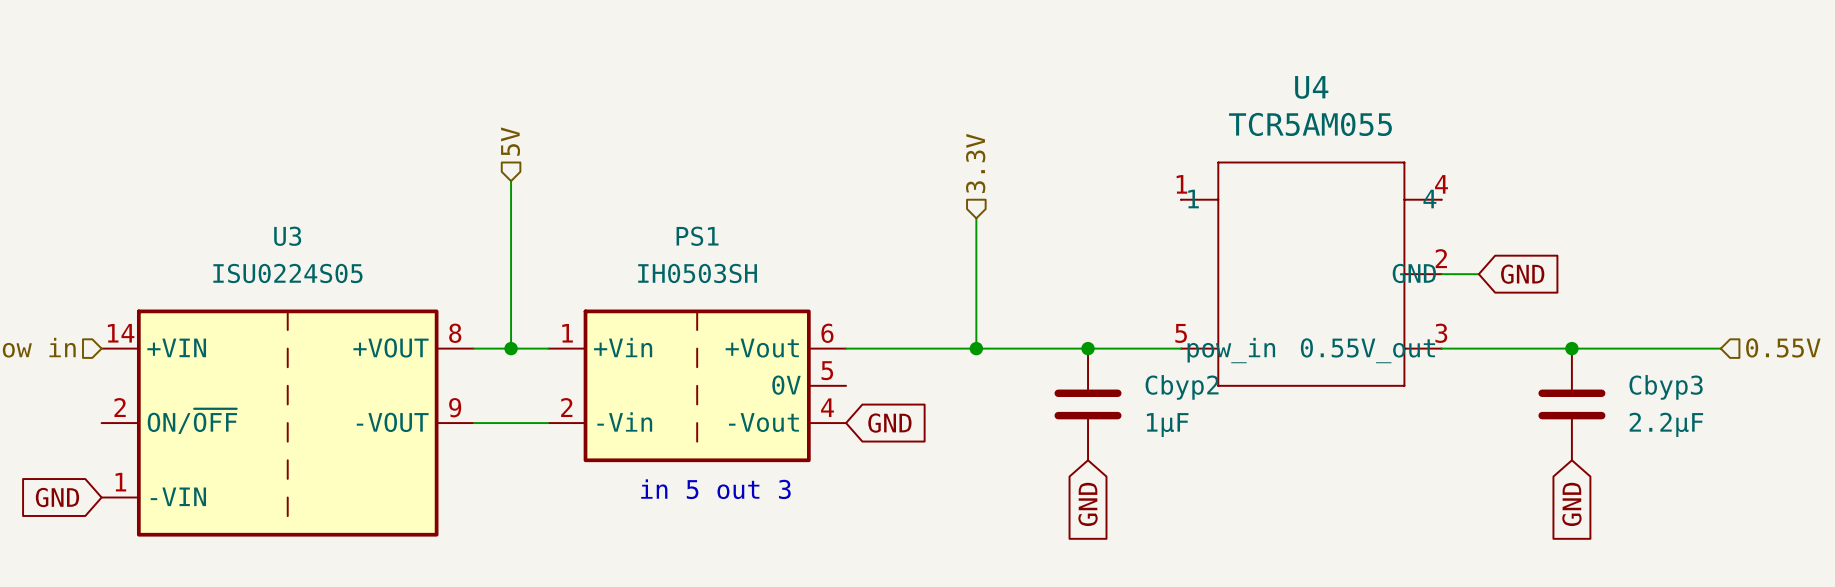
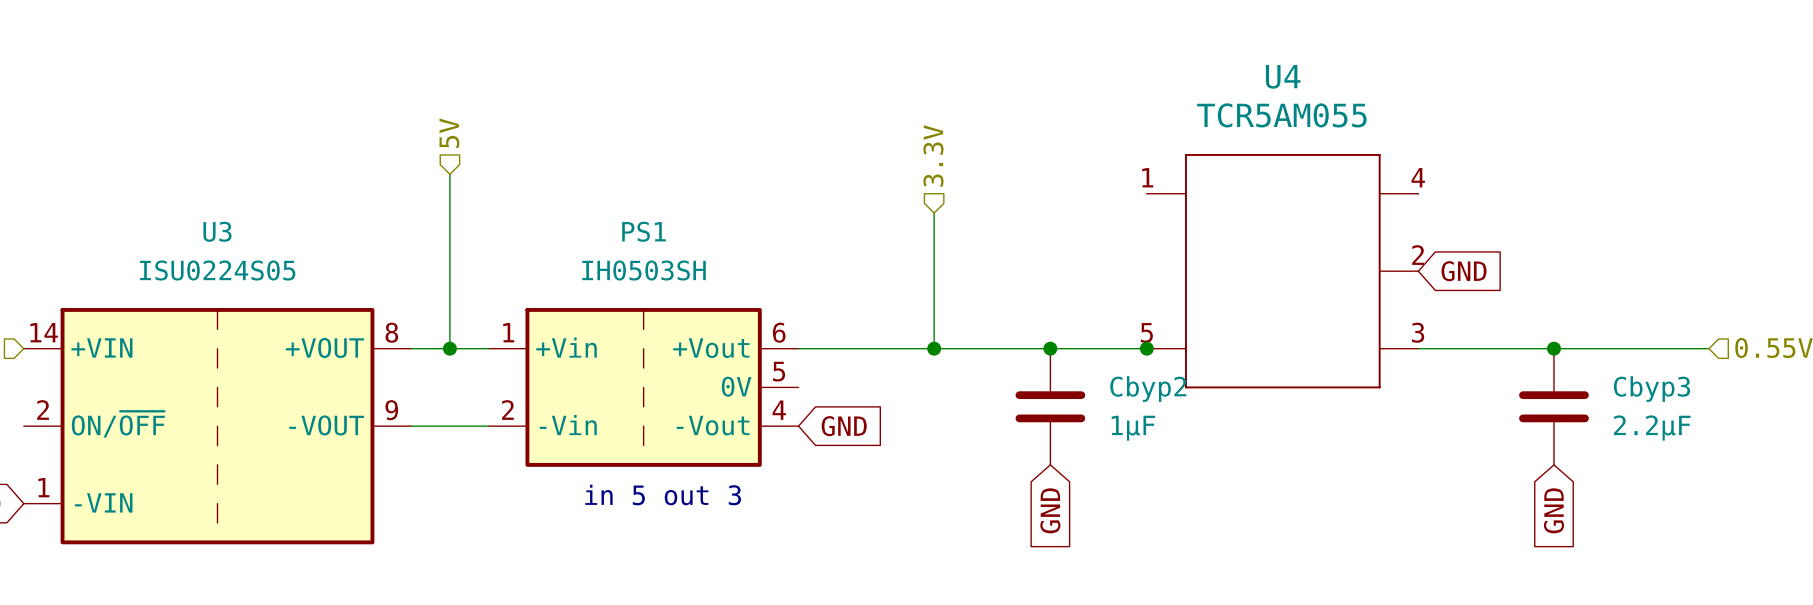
U4 symbol: [1181, 161, 1442, 387] -> [1146, 154, 1419, 389]
wire: (1441, 274) (1478, 274) -> none
global label position: GND (1522, 274) -> GND (1464, 271)
junction: none -> (1146, 348)

